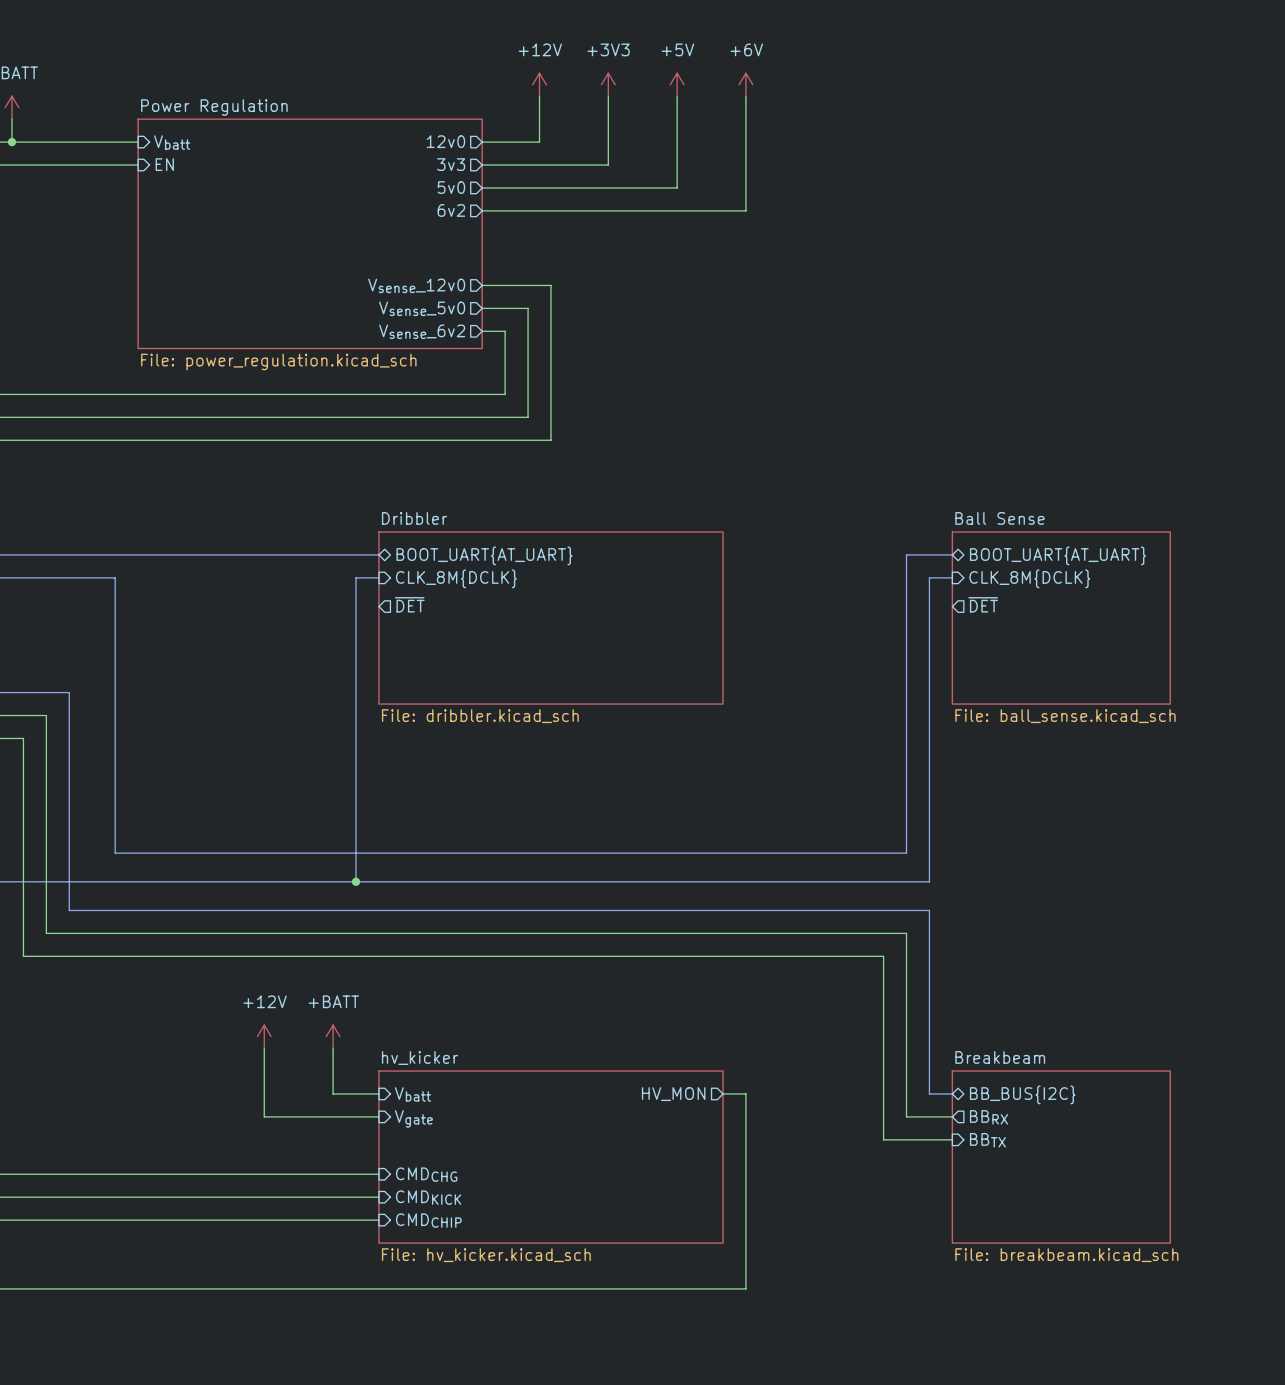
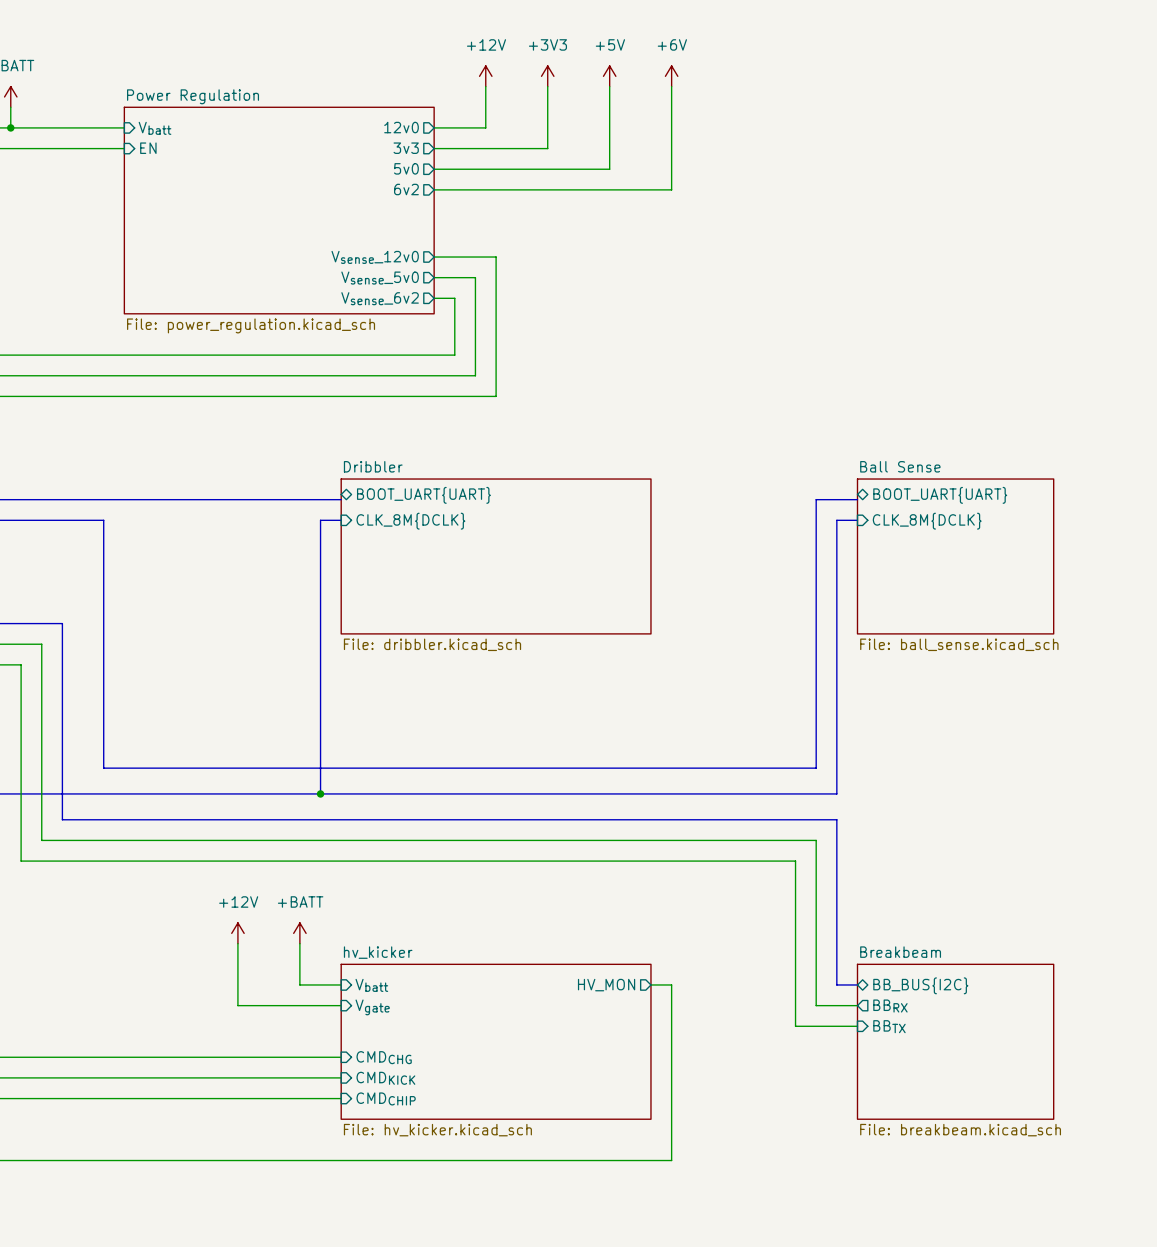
sheet pin: BOOT_UART{AT_UART} (484, 555) -> BOOT_UART{UART} (423, 495)
sheet pin: BOOT_UART{AT_UART} (1057, 555) -> BOOT_UART{UART} (940, 495)
sheet pin: ~{DET} (409, 604) -> none
sheet pin: ~{DET} (983, 604) -> none

